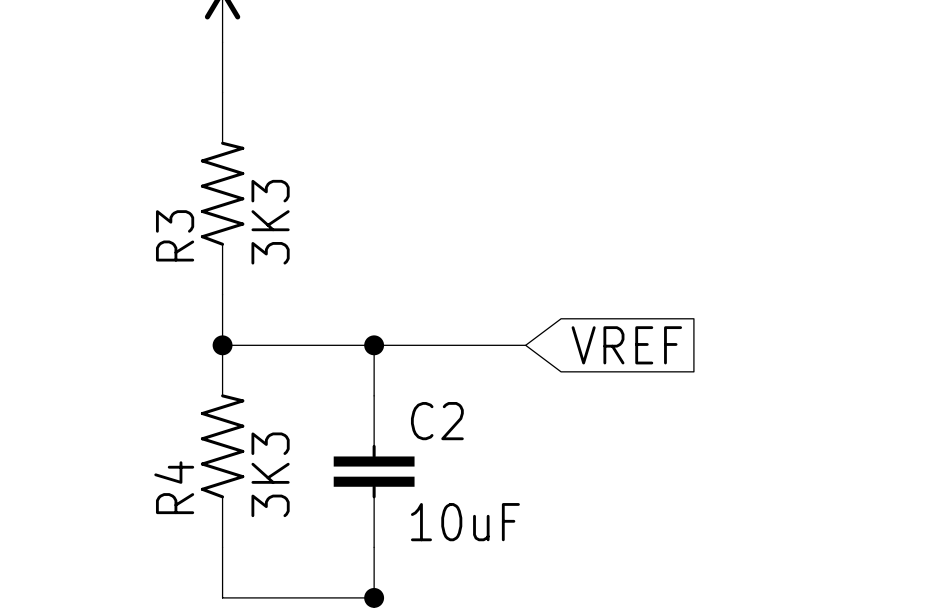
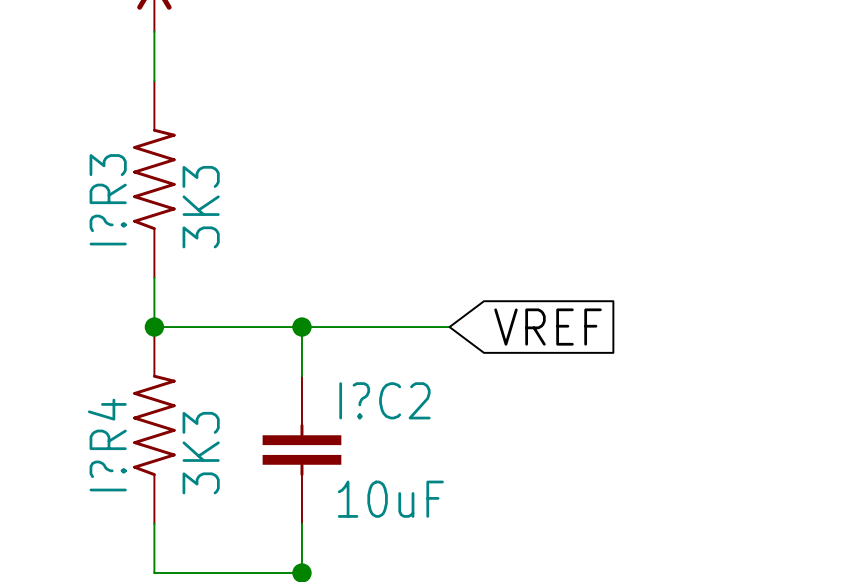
R3 name: R3 (175, 235) -> I?R3 (108, 199)
C2 name: C2 (437, 421) -> I?C2 (384, 400)
R4 name: R4 (174, 487) -> I?R4 (107, 445)

